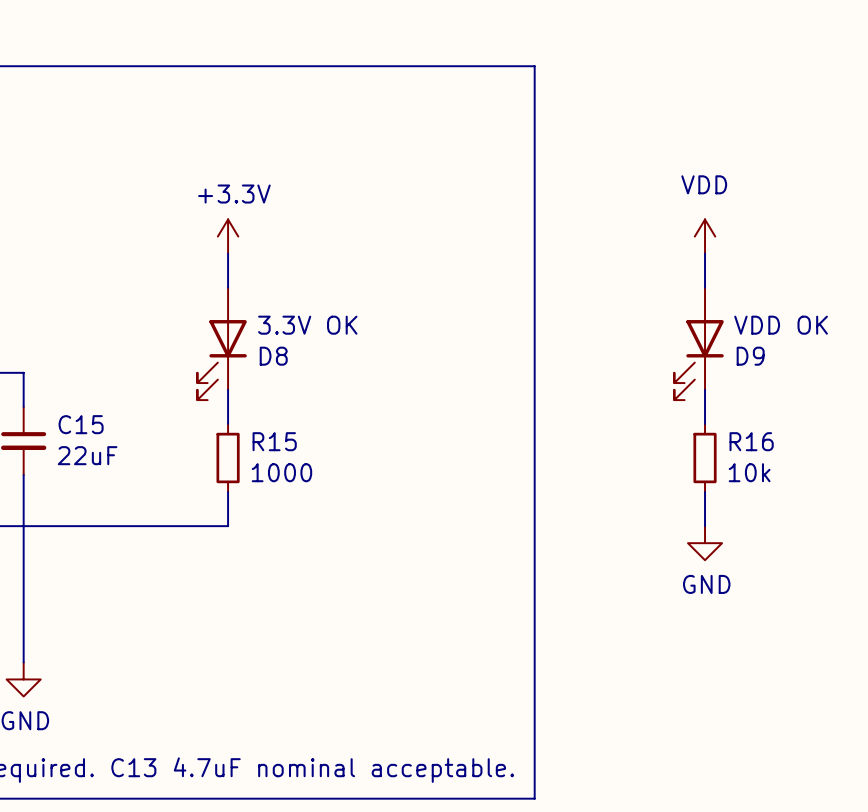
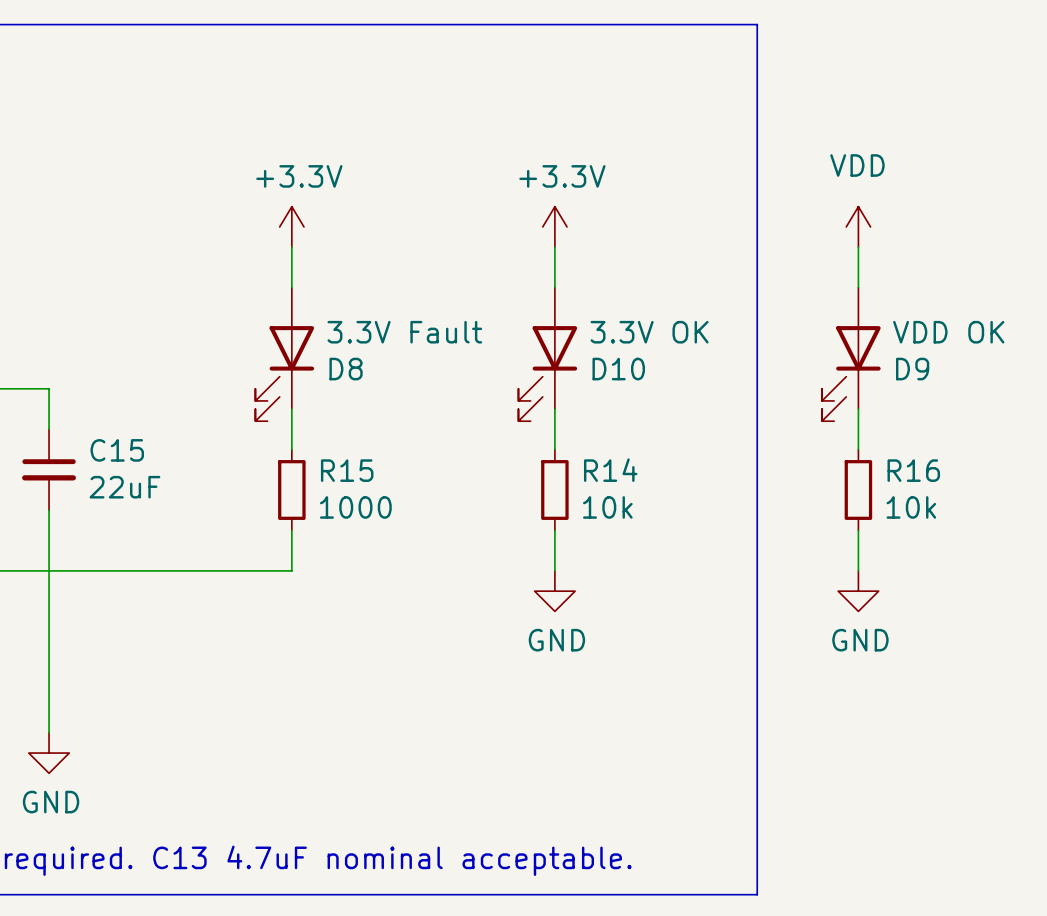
line: (534, 66) (534, 798) -> (656, 24) (757, 24) (757, 894) (656, 894)
power symbol: none -> +3.3V (554, 226)
wire: none -> (554, 247) (554, 287)
D8 value: 3.3V OK (307, 325) -> 3.3V Fault (404, 332)
D10: none -> 3.3V OK (547, 354)
wire: none -> (554, 409) (554, 449)
R14: none -> 10k (554, 489)
wire: none -> (554, 530) (554, 570)
power symbol: none -> GND (554, 591)

